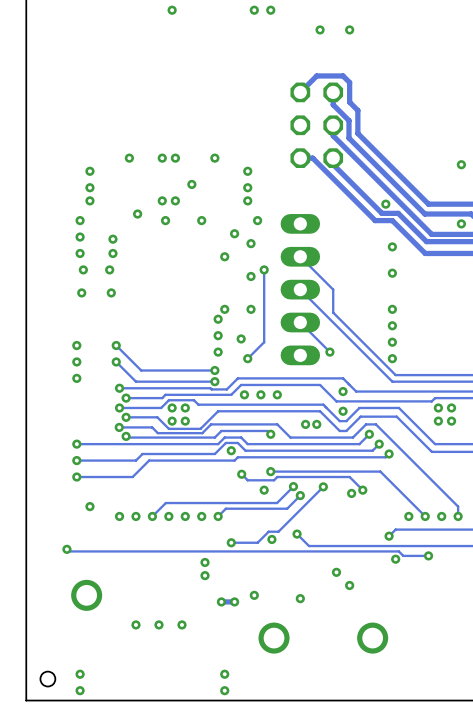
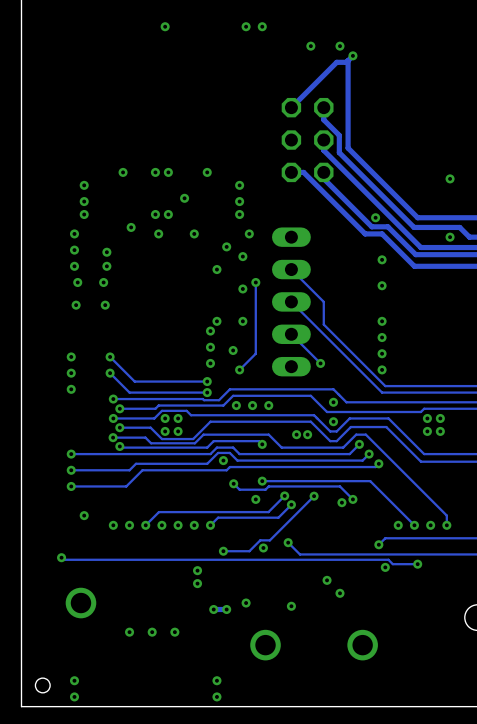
track: none -> (352, 55) (346, 62) (336, 62) (307, 91)
via: none -> (352, 55)
track: (316, 75) (343, 75) (349, 82) (349, 102) (357, 110) -> (348, 60) (348, 125)

